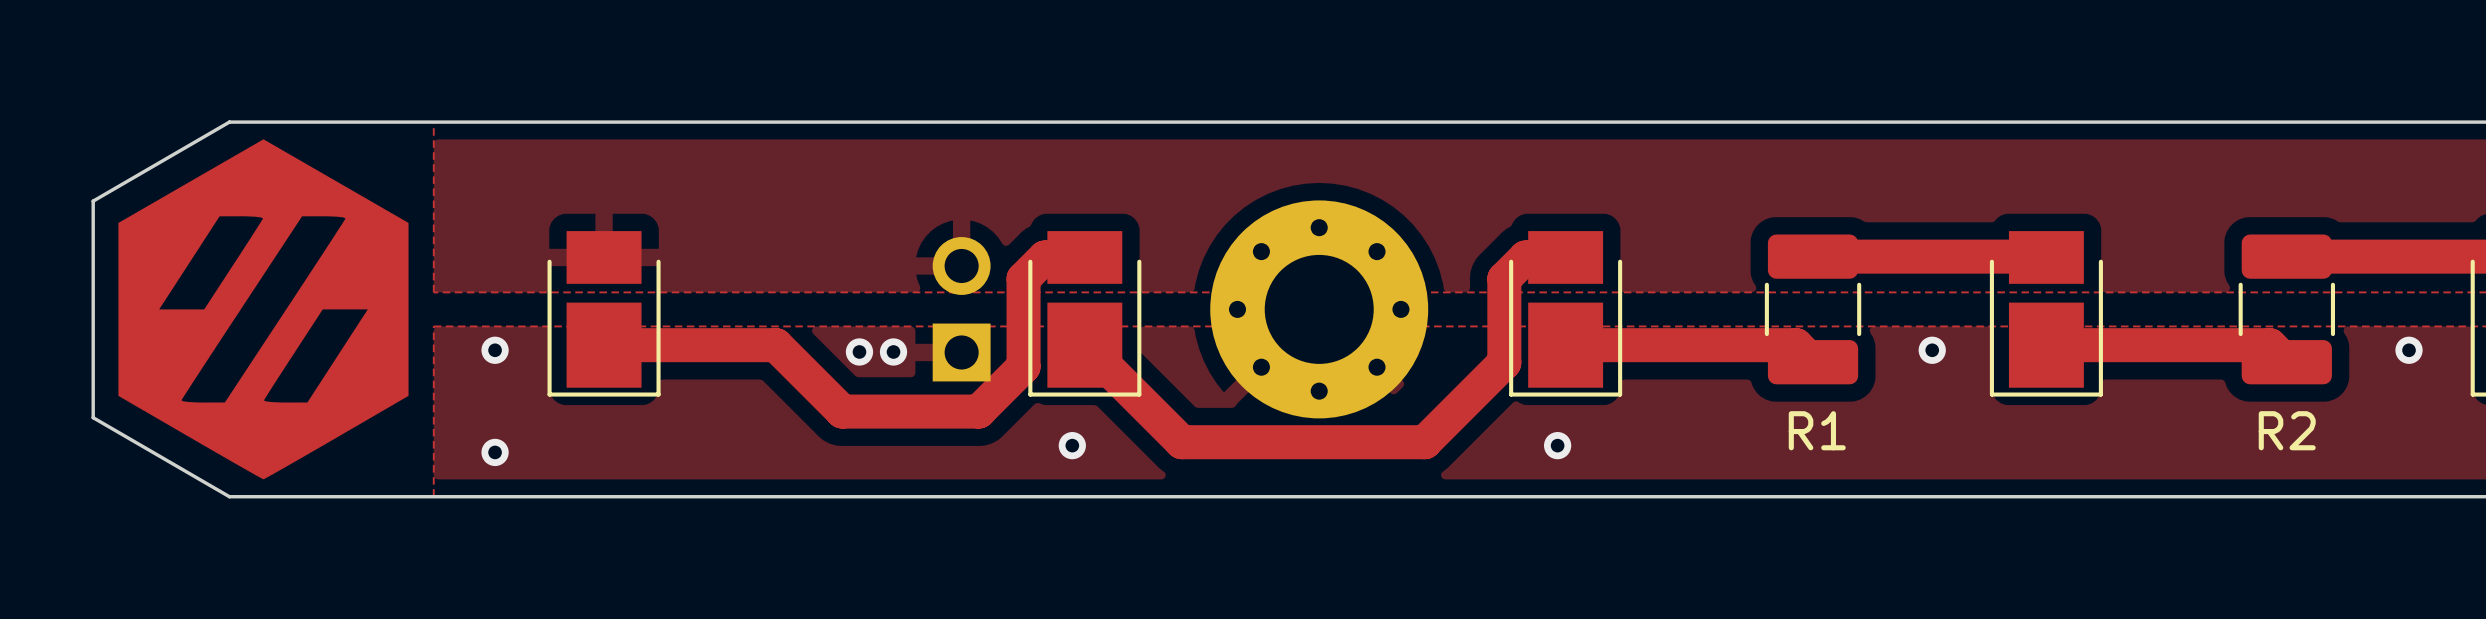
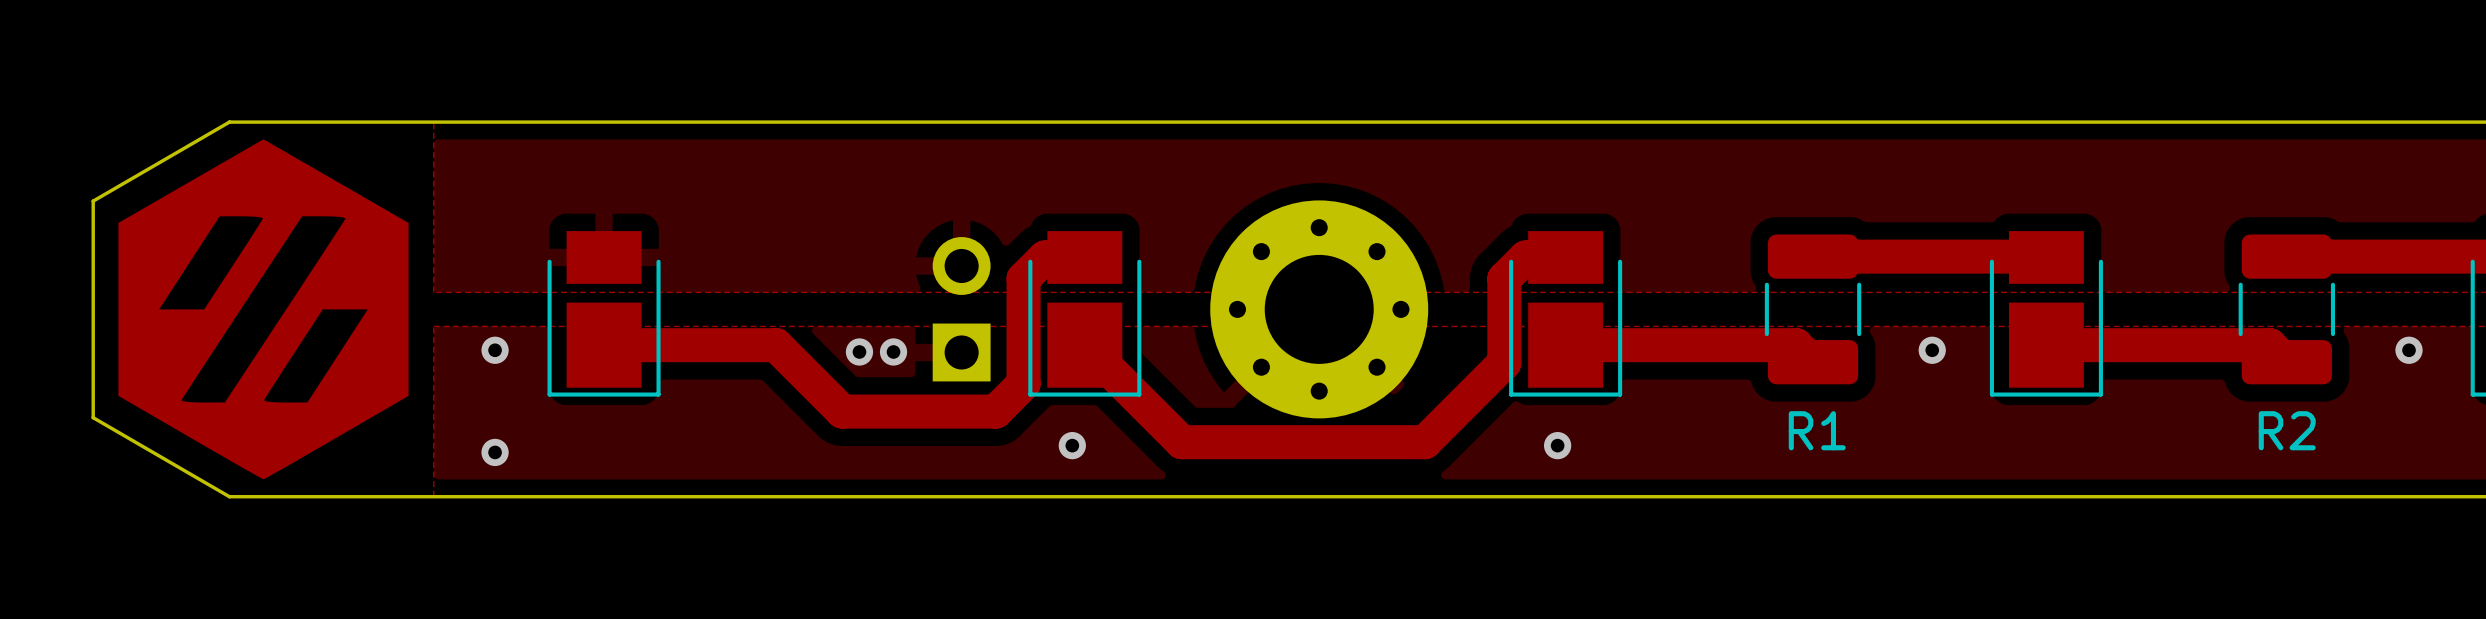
track: (1023, 366) (978, 411) -> (1023, 366) (1023, 383) (995, 411) (978, 411)

